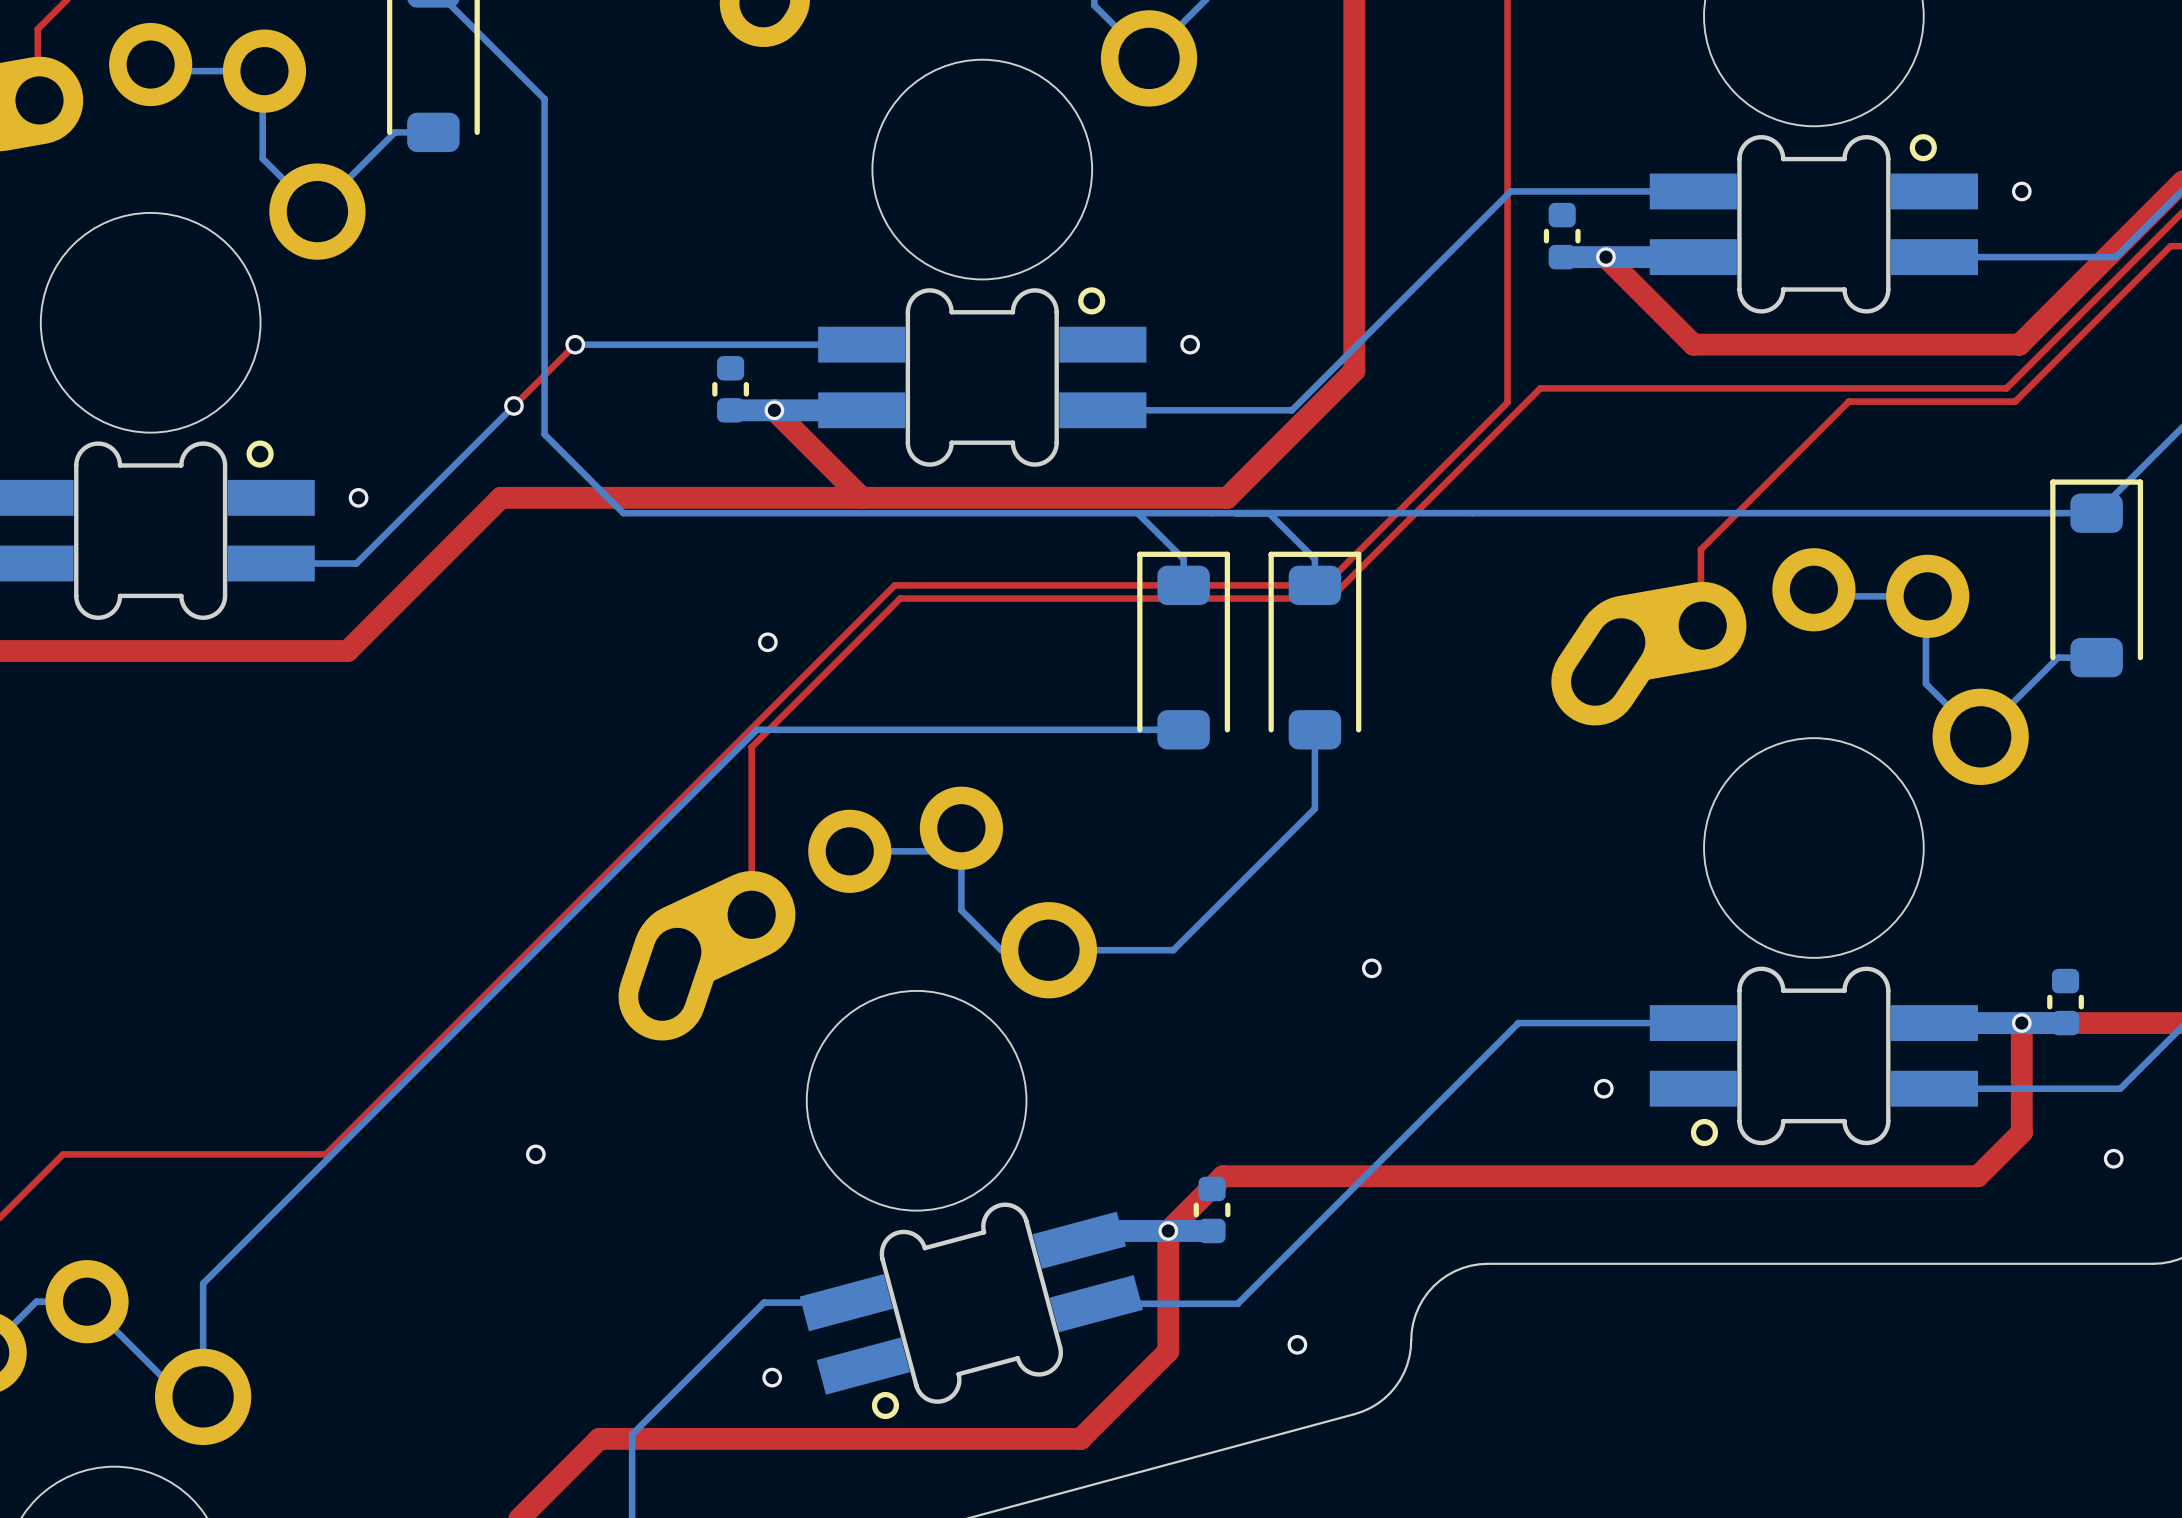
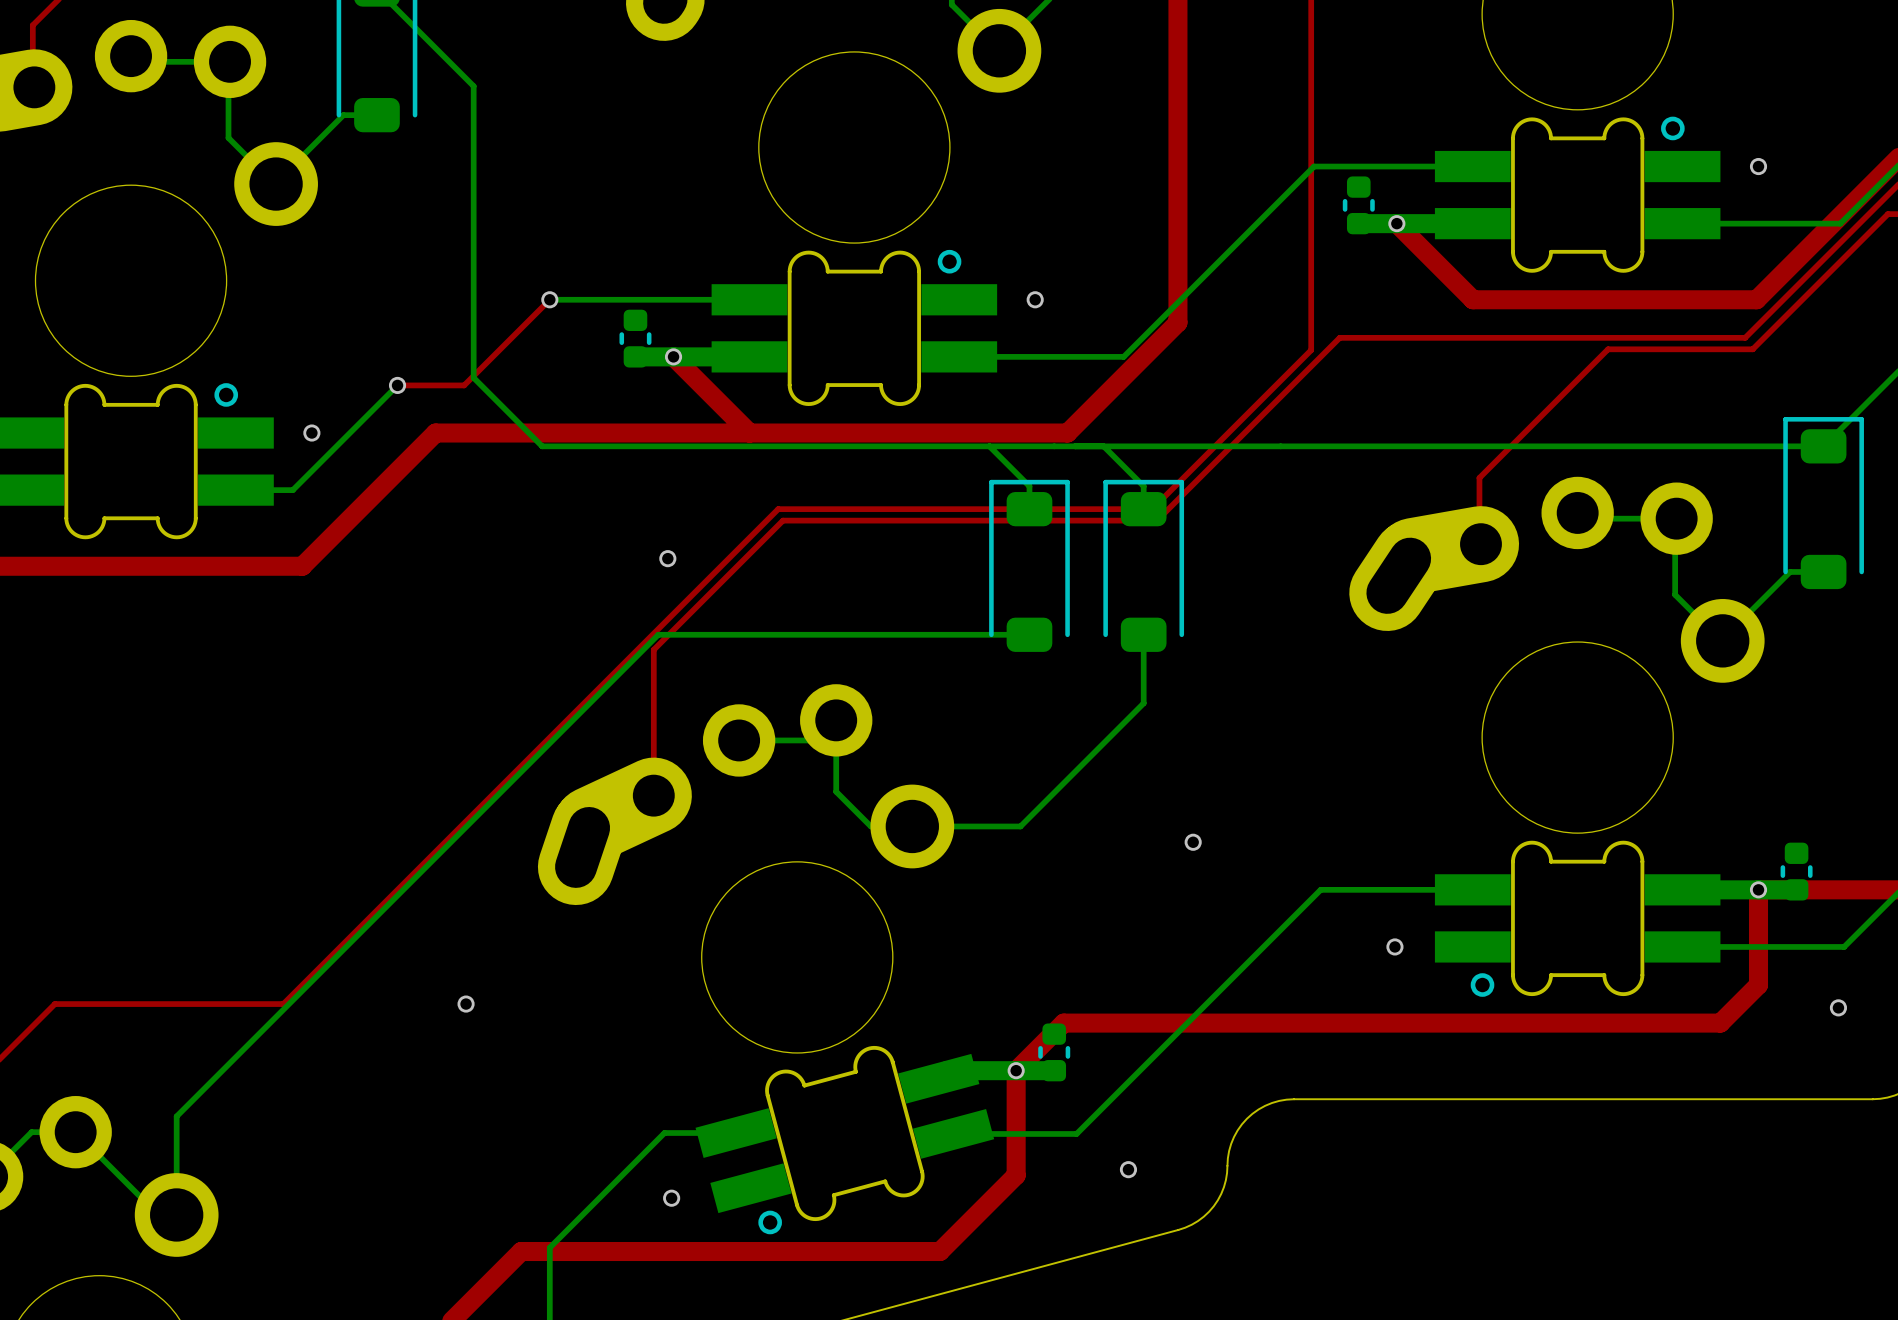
top track: (575, 344) (513, 405) -> none
via position: (575, 344) -> (549, 299)
top track: none -> (549, 299) (464, 385) (397, 385)
bottom track: (632, 344) (575, 344) -> none
bottom track: (513, 405) (356, 563) (336, 563) -> (397, 385) (292, 490)
via: (513, 405) -> none
via: none -> (397, 385)

